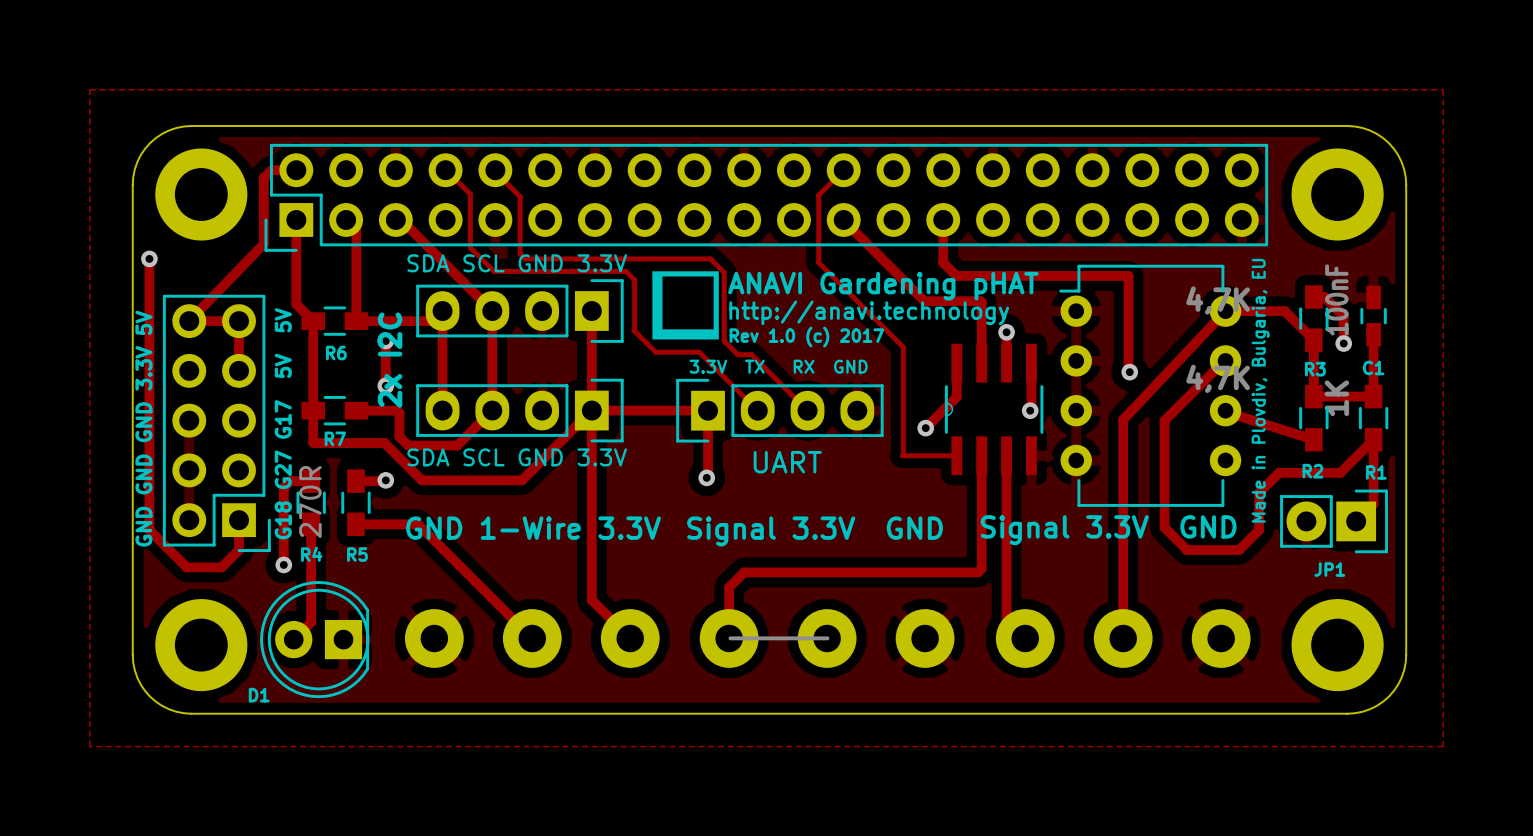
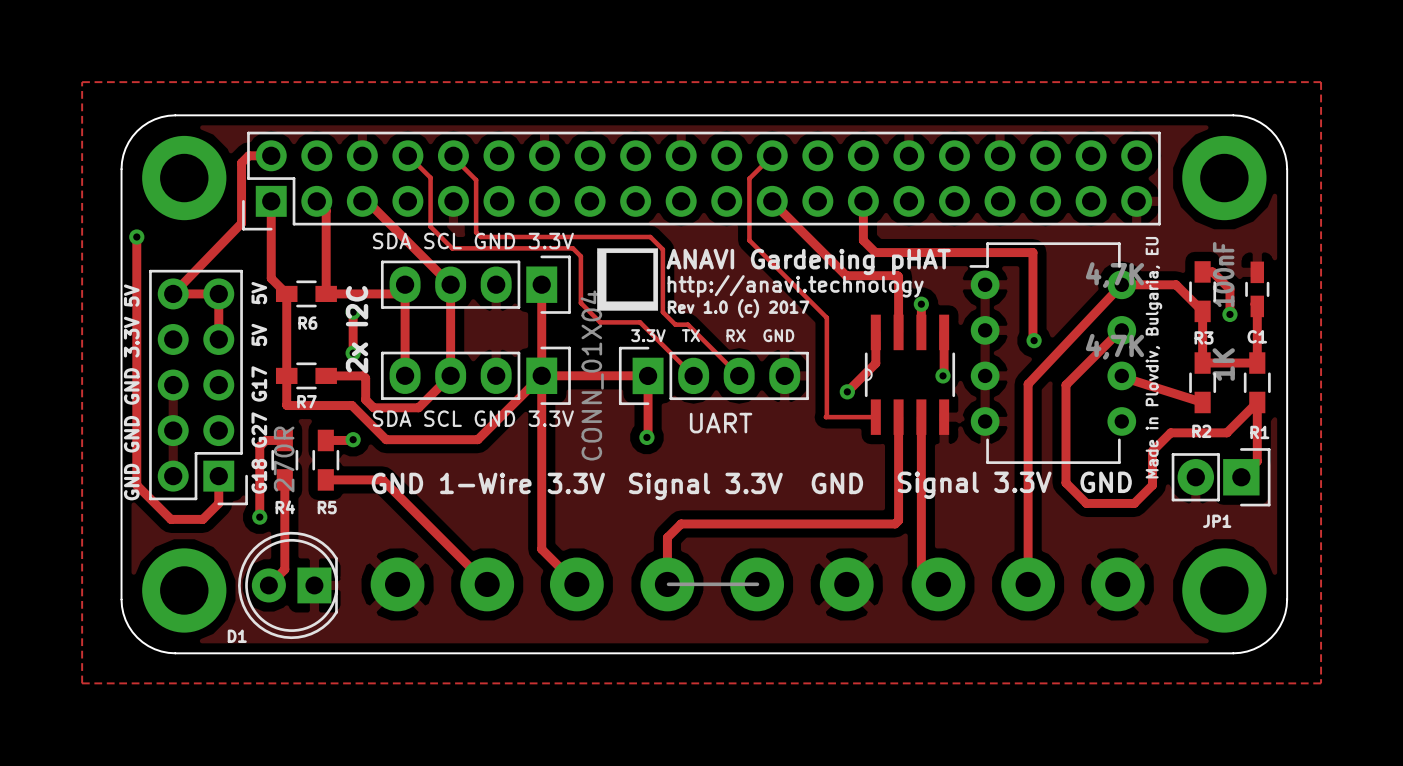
UART value: none -> CONN_01X04 (592, 375)

